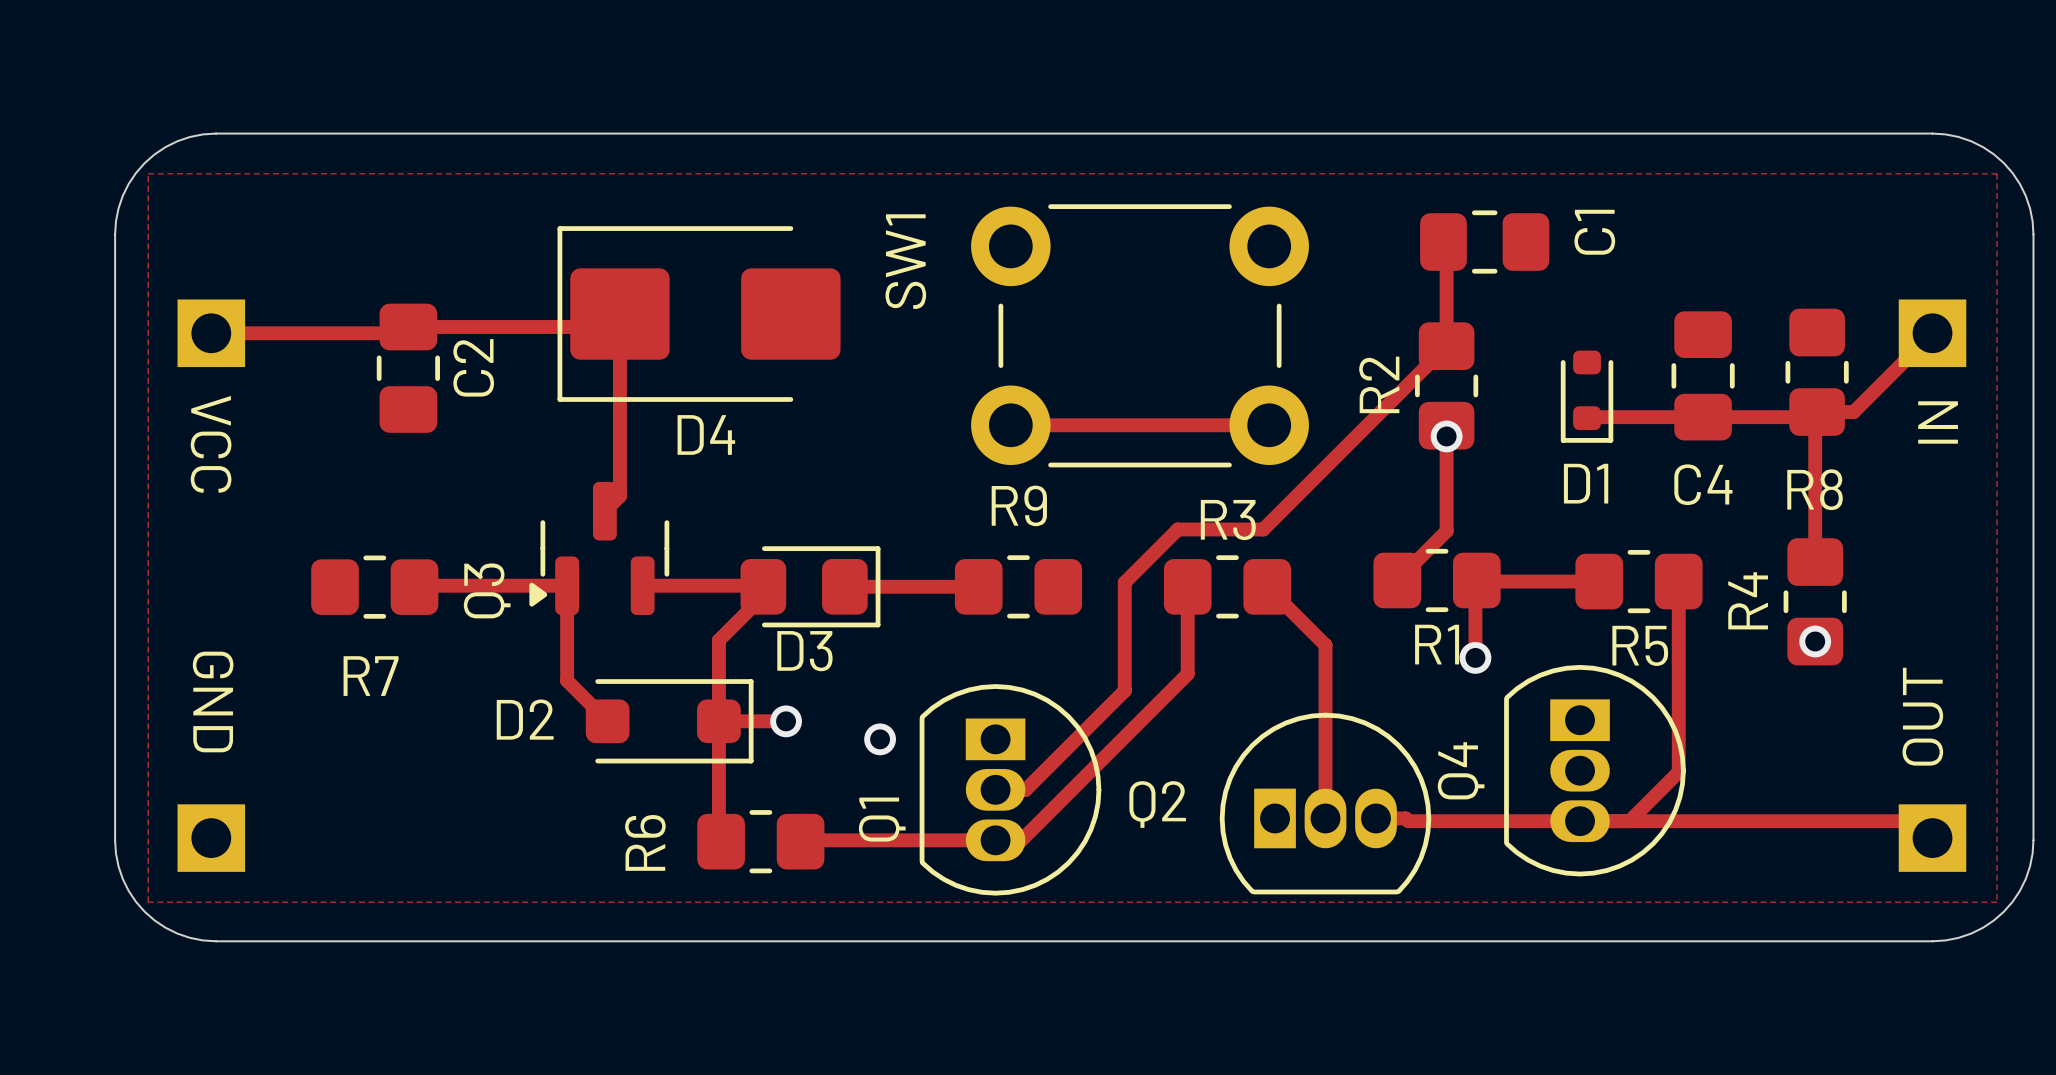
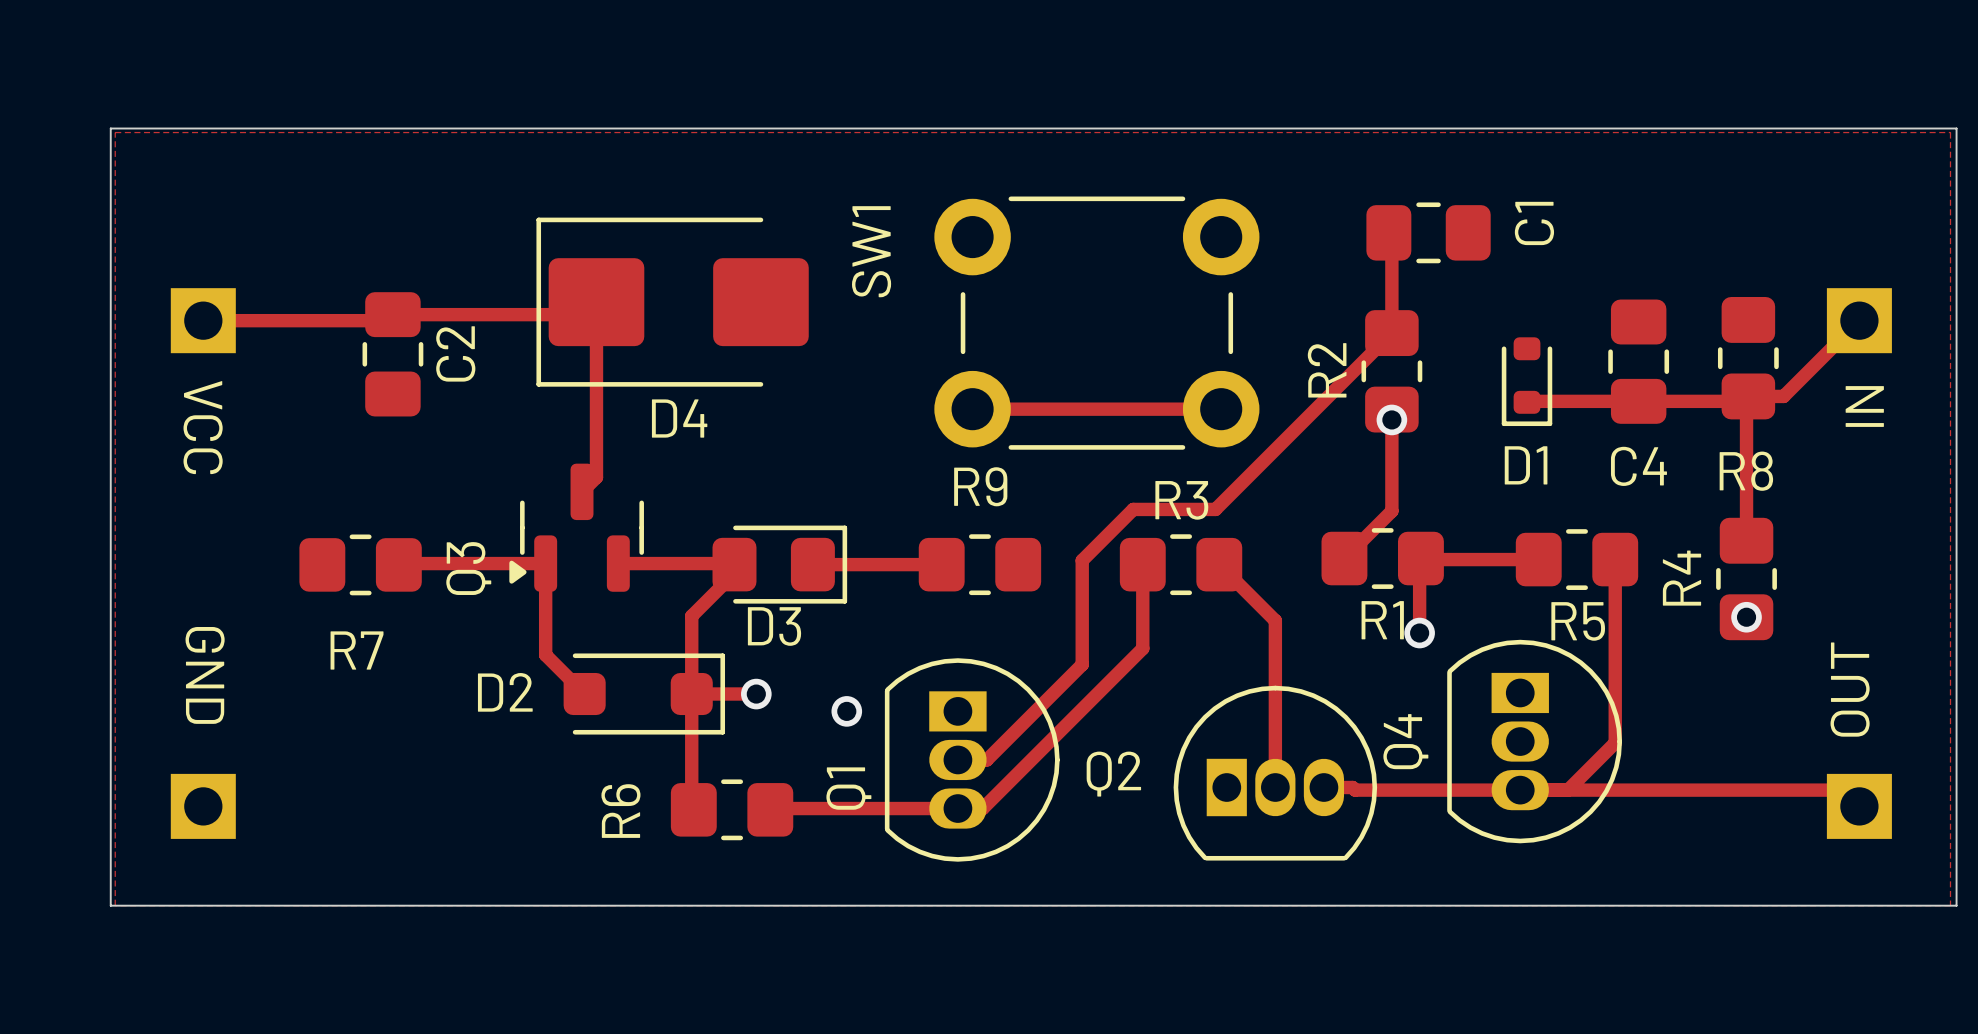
board edge: (216, 133) (202, 134) (177, 141) (154, 154) (144, 163) (128, 184) (122, 195) (118, 208) (115, 234) -> (207, 128) (110, 128) (110, 225)
board edge: (1932, 133) (1945, 134) (1971, 141) (1982, 147) (2003, 163) (2012, 173) (2025, 195) (2030, 208) (2033, 234) -> (1859, 128) (1956, 128) (1956, 225)
zone outline: (148, 173) (1997, 173) (1997, 902) (148, 902) (148, 173) -> (115, 132) (115, 905) (1950, 905) (1950, 132) (115, 132)
board edge: (115, 840) (115, 853) (122, 878) (128, 890) (144, 911) (154, 920) (177, 933) (202, 940) (216, 941) -> (110, 808) (110, 905) (207, 905)
board edge: (2033, 840) (2030, 866) (2025, 878) (2012, 901) (2003, 911) (1982, 927) (1971, 933) (1958, 937) (1932, 941) -> (1956, 808) (1956, 905) (1859, 905)

